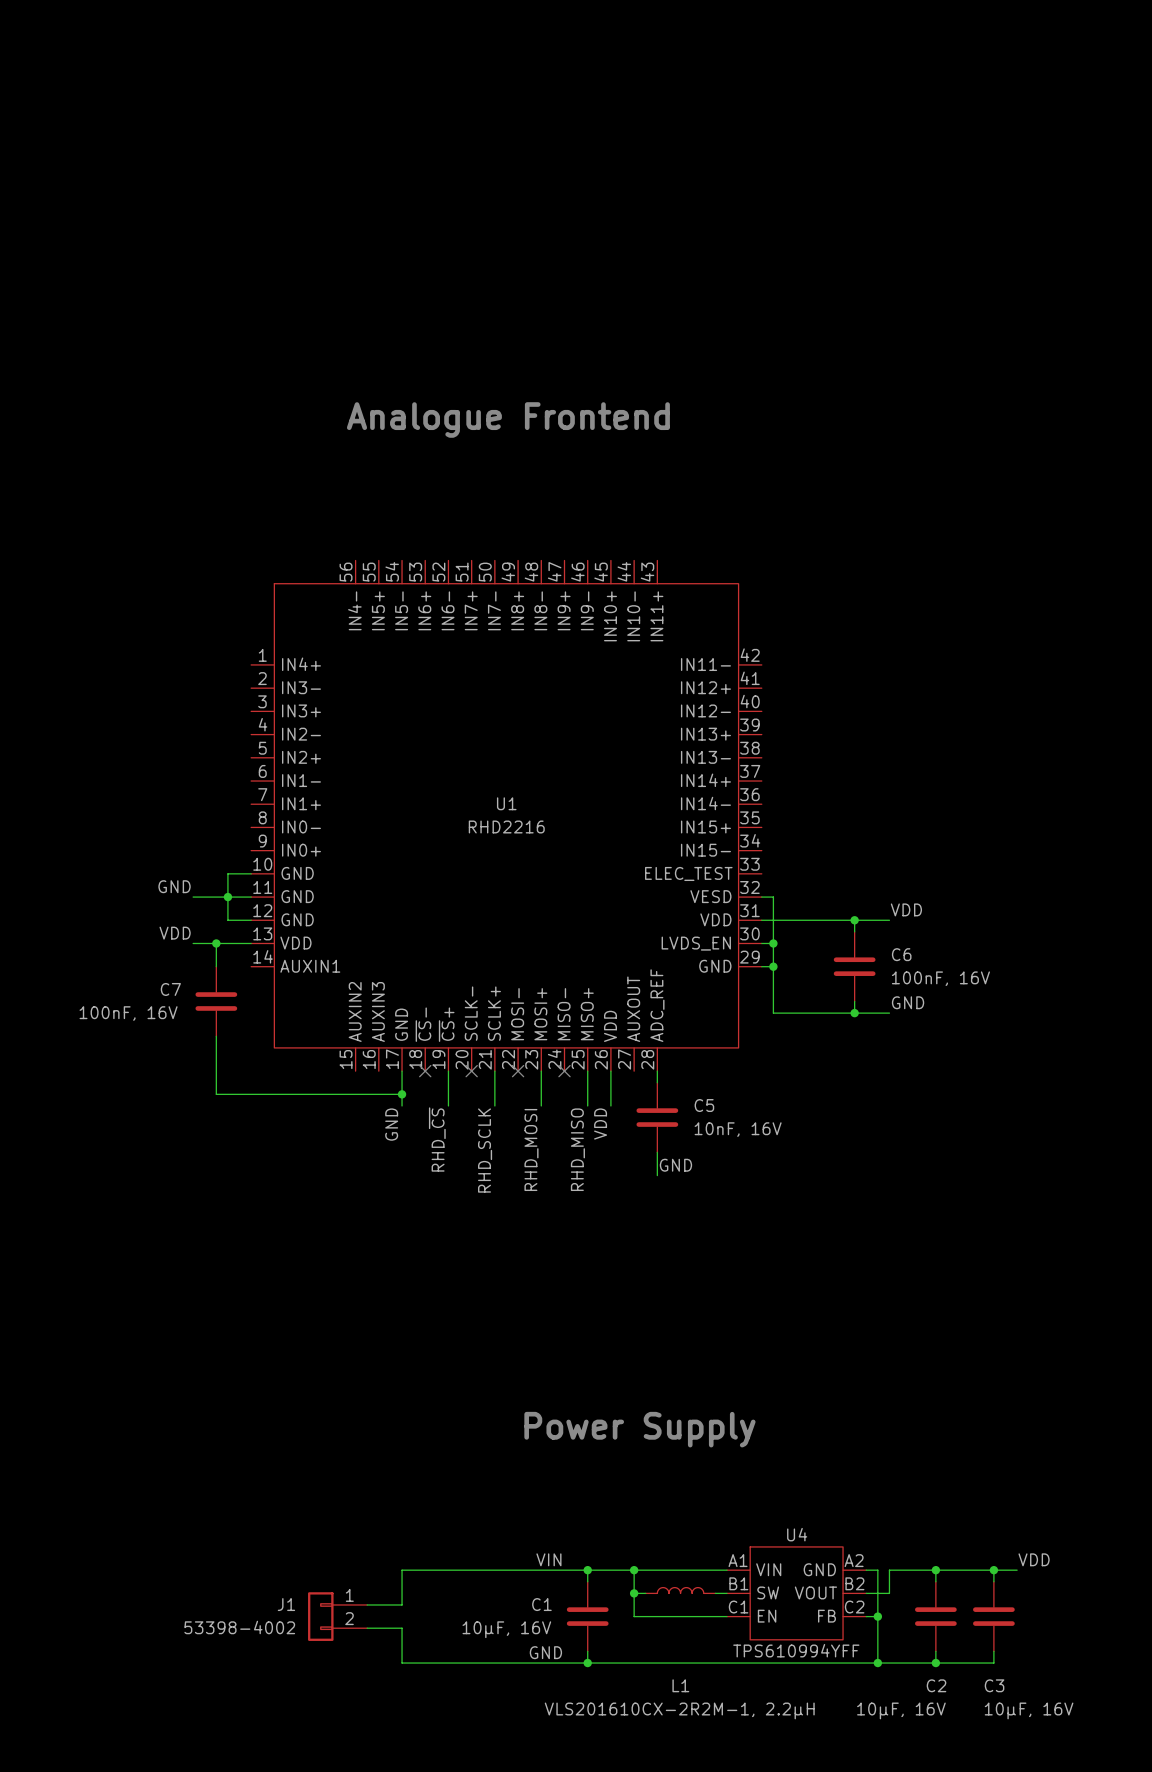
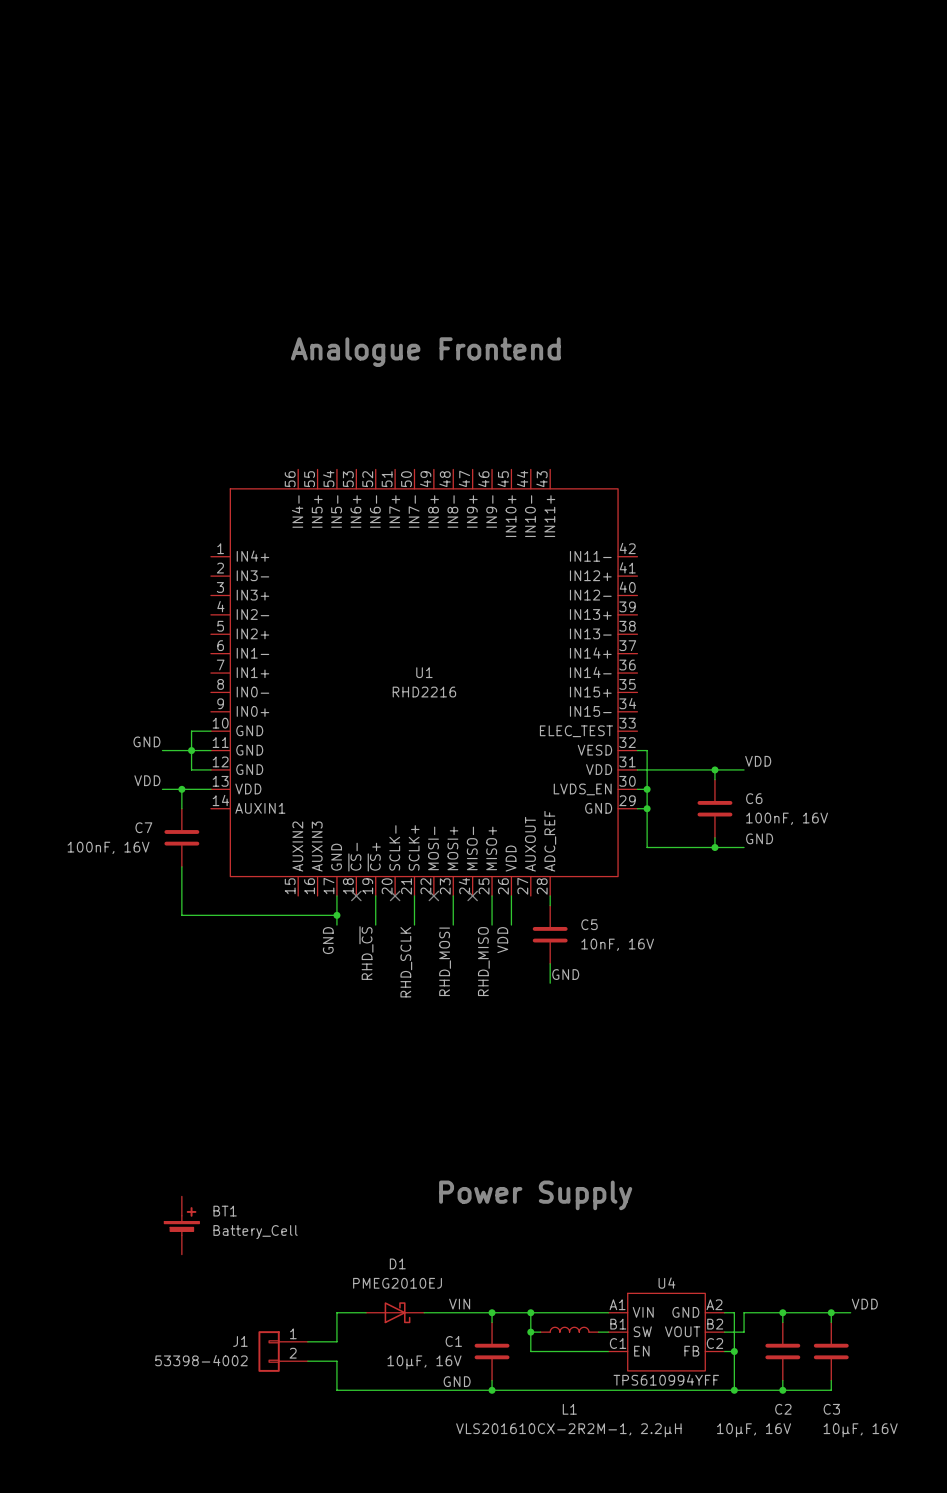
BT1: none -> Battery_Cell (181, 1225)
D1: none -> PMEG2010EJ (395, 1312)

